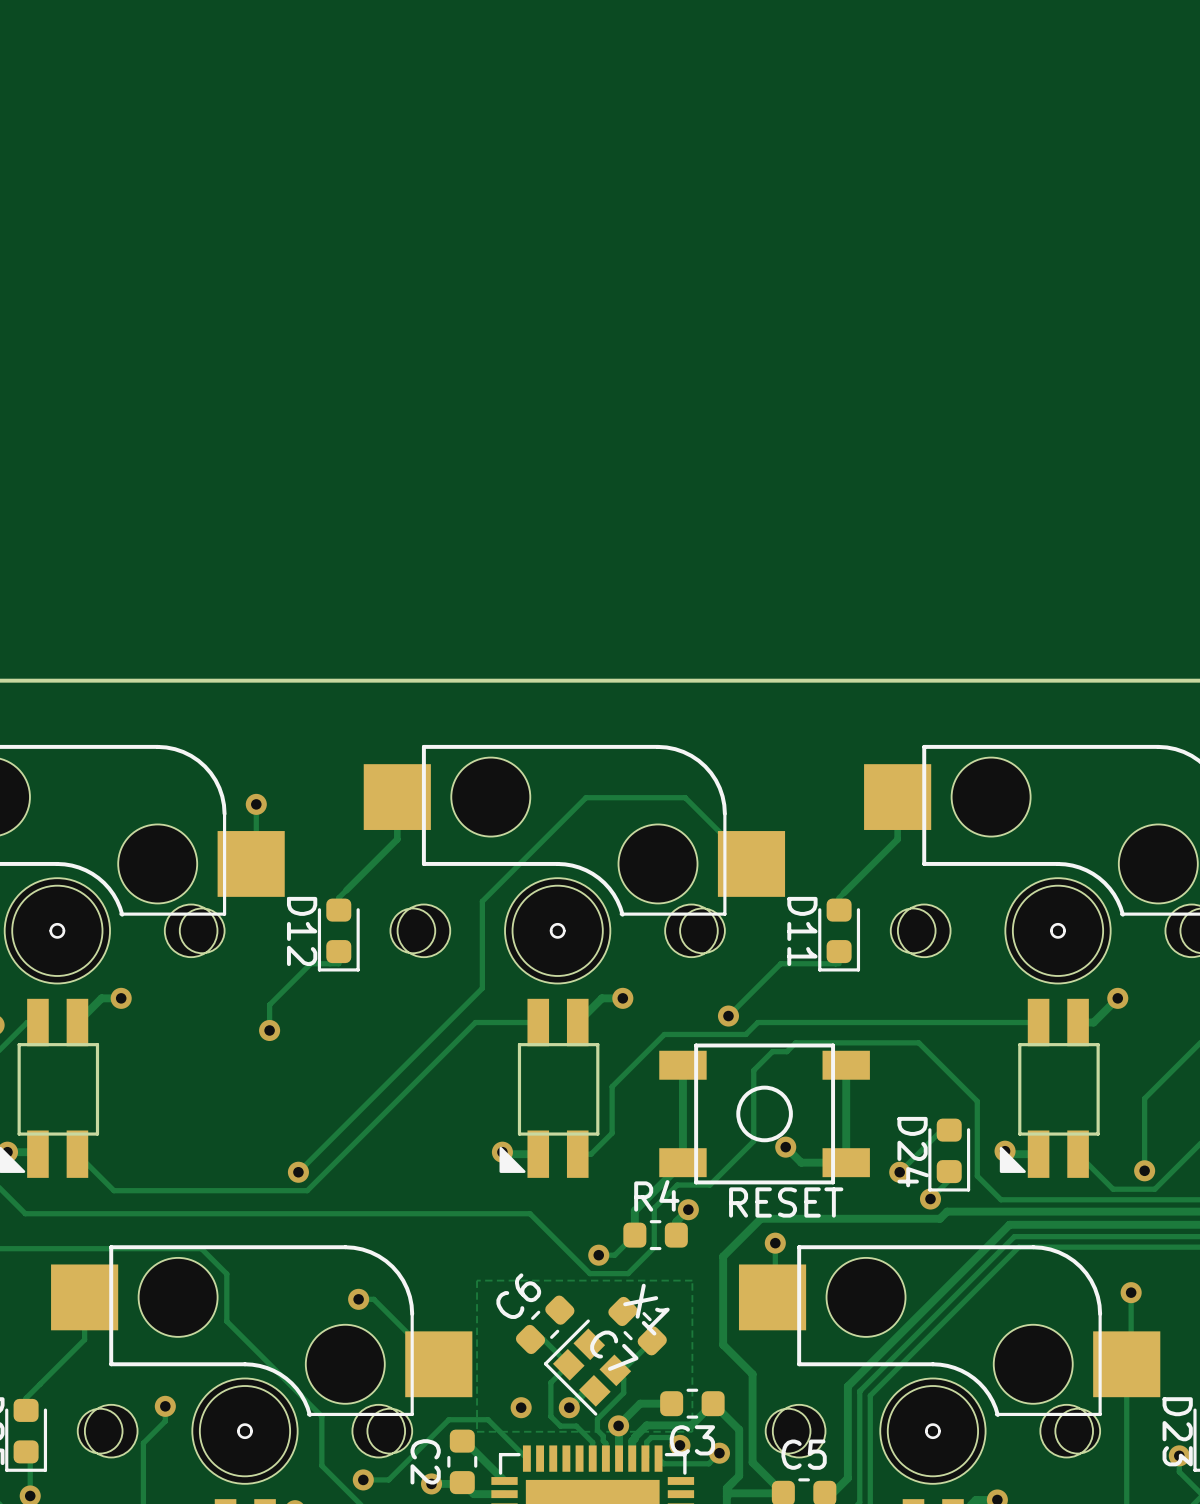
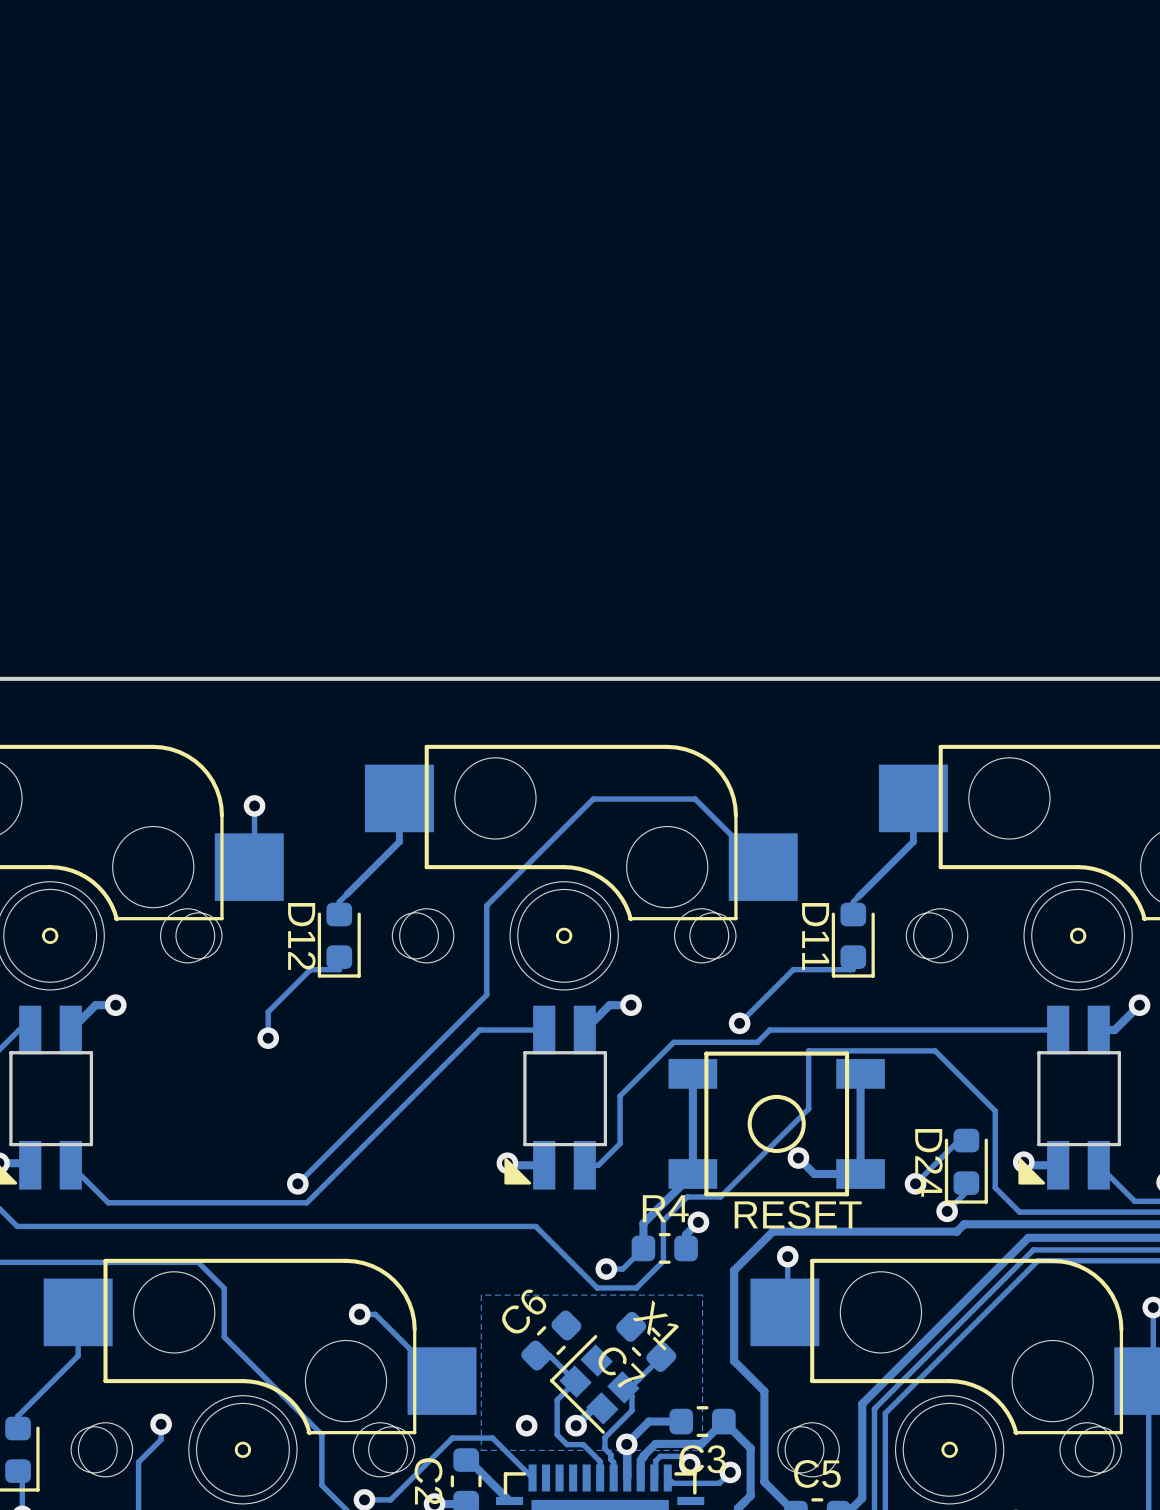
track: (795, 1042) (786, 1051) (772, 1051) (753, 1070) (753, 1141) -> (808, 1050) (808, 1108) (765, 1151)

